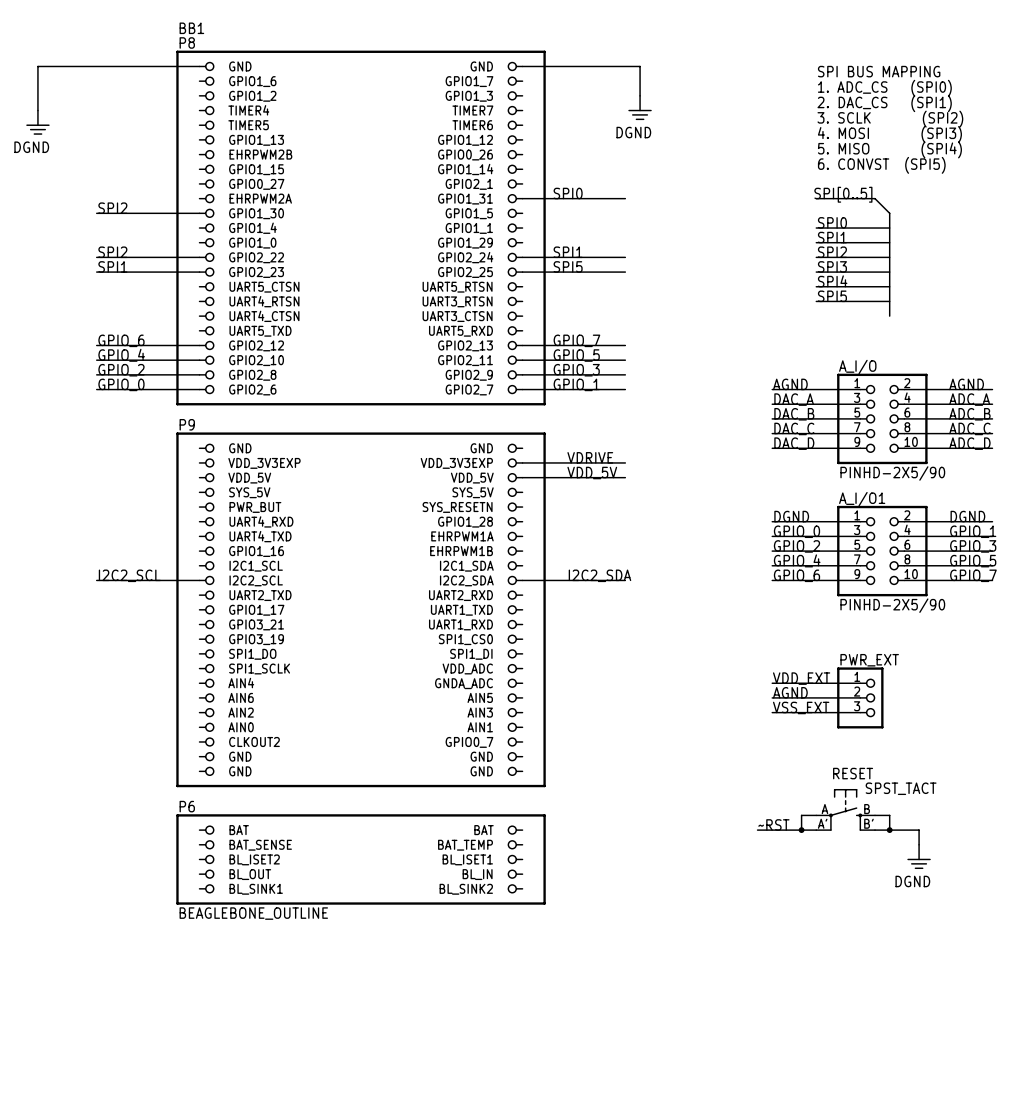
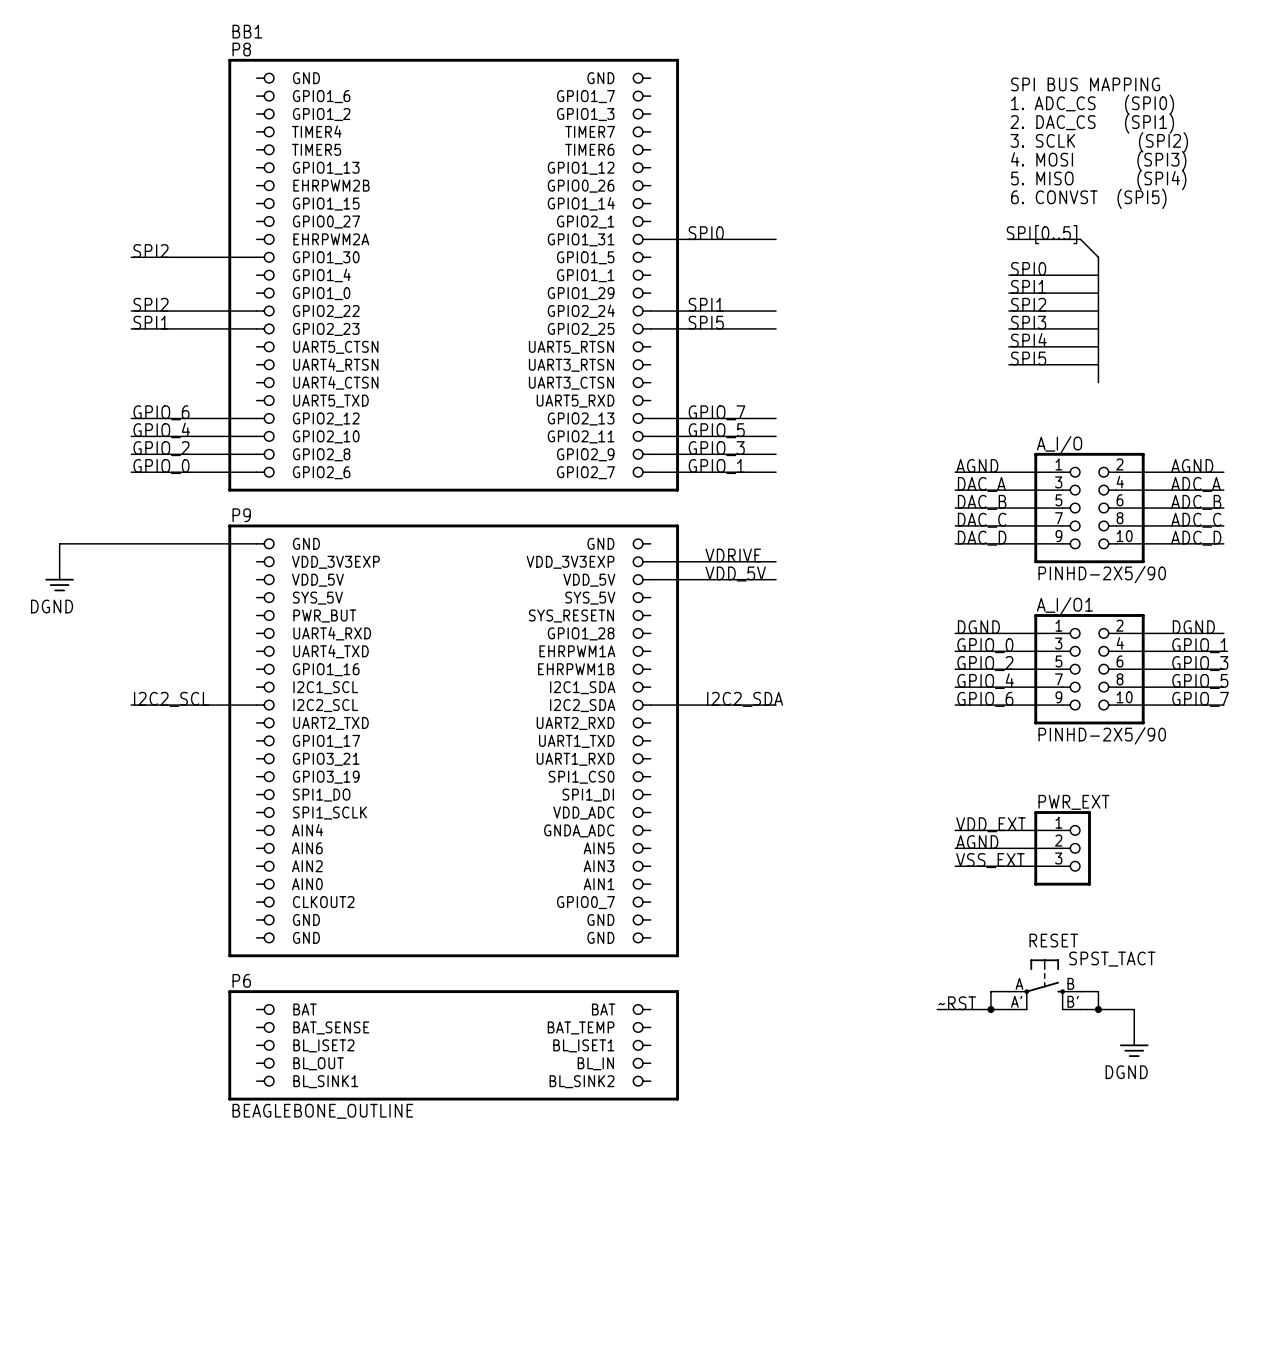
wire: (199, 66) (37, 66) (37, 110) -> none
wire: (522, 66) (640, 66) (640, 95) -> none
power symbol: DGND (640, 107) -> none
power symbol: DGND (37, 122) -> none
wire: none -> (256, 543) (59, 543) (59, 561)
power symbol: none -> DGND (59, 576)

